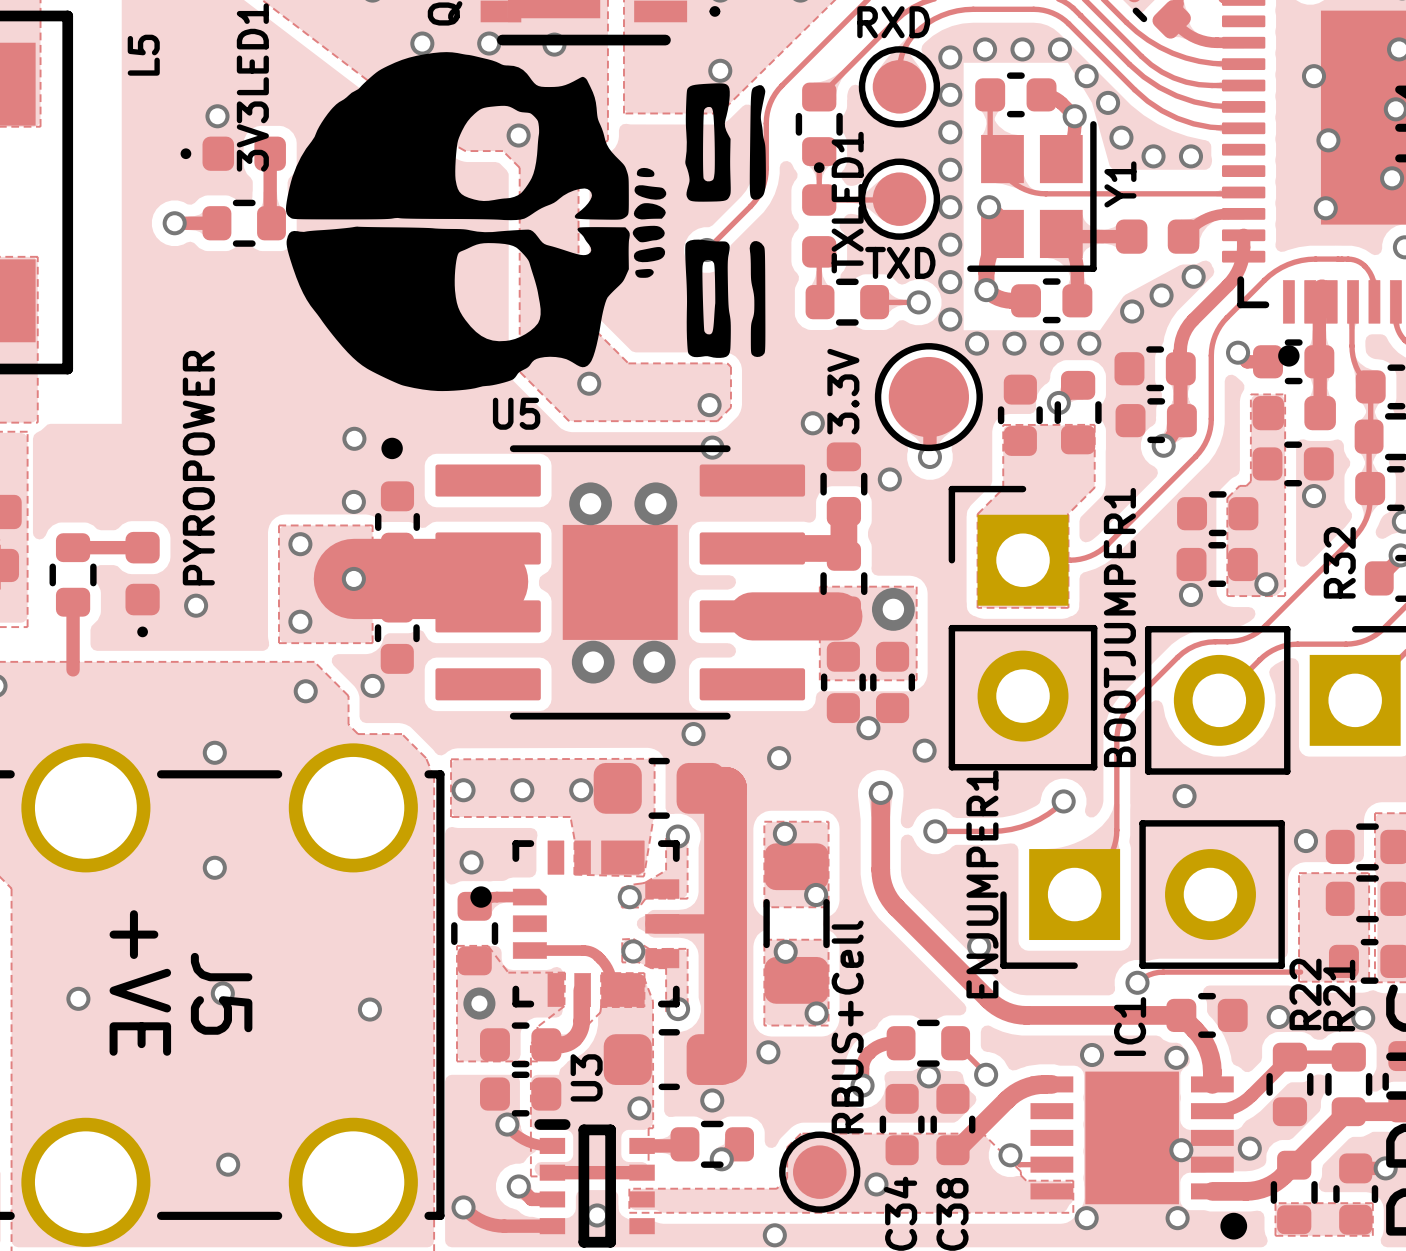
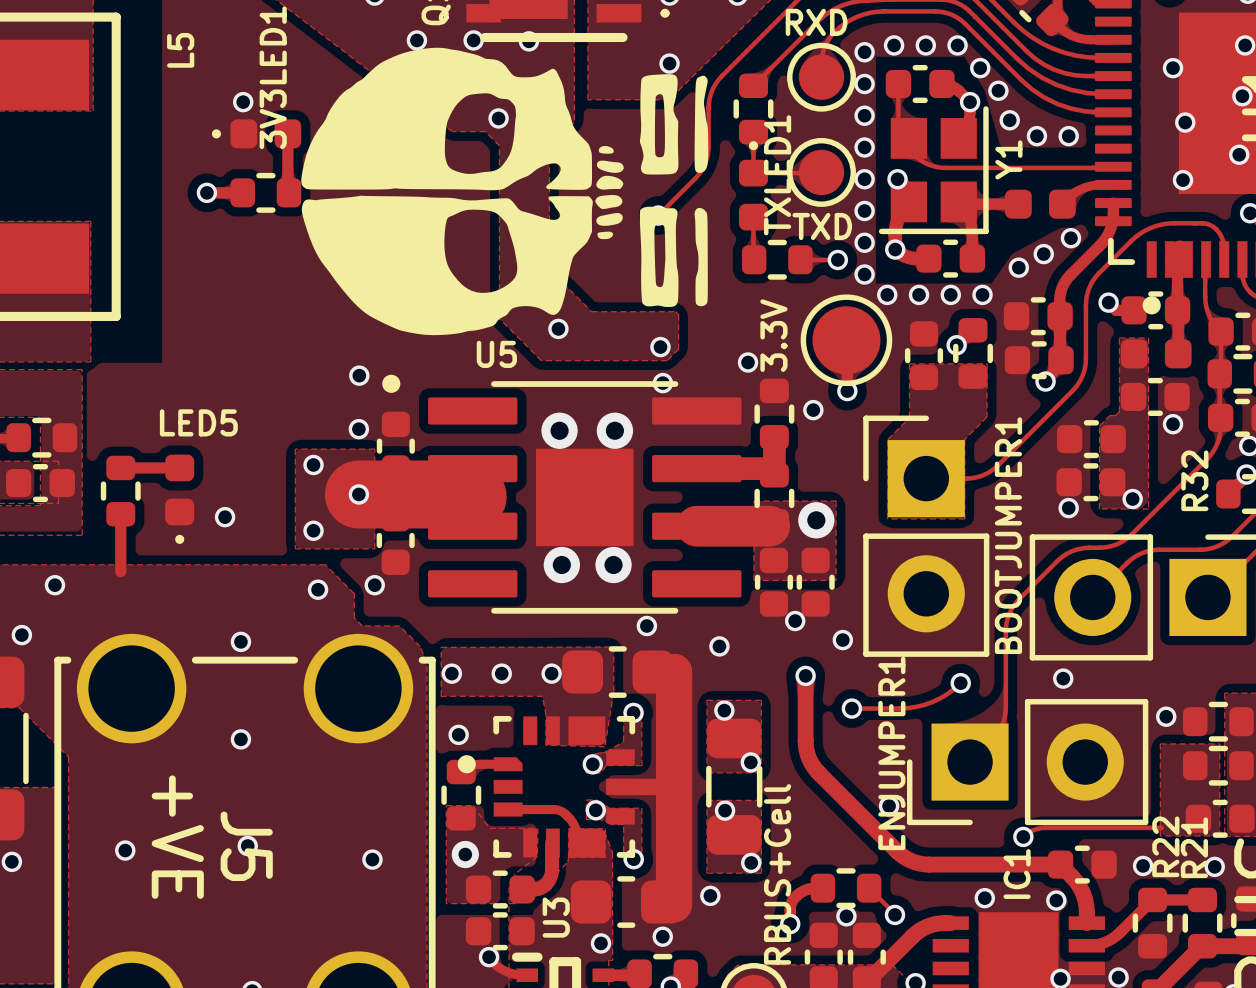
PYROPOWER name: PYROPOWER (198, 468) -> LED5 (198, 422)

